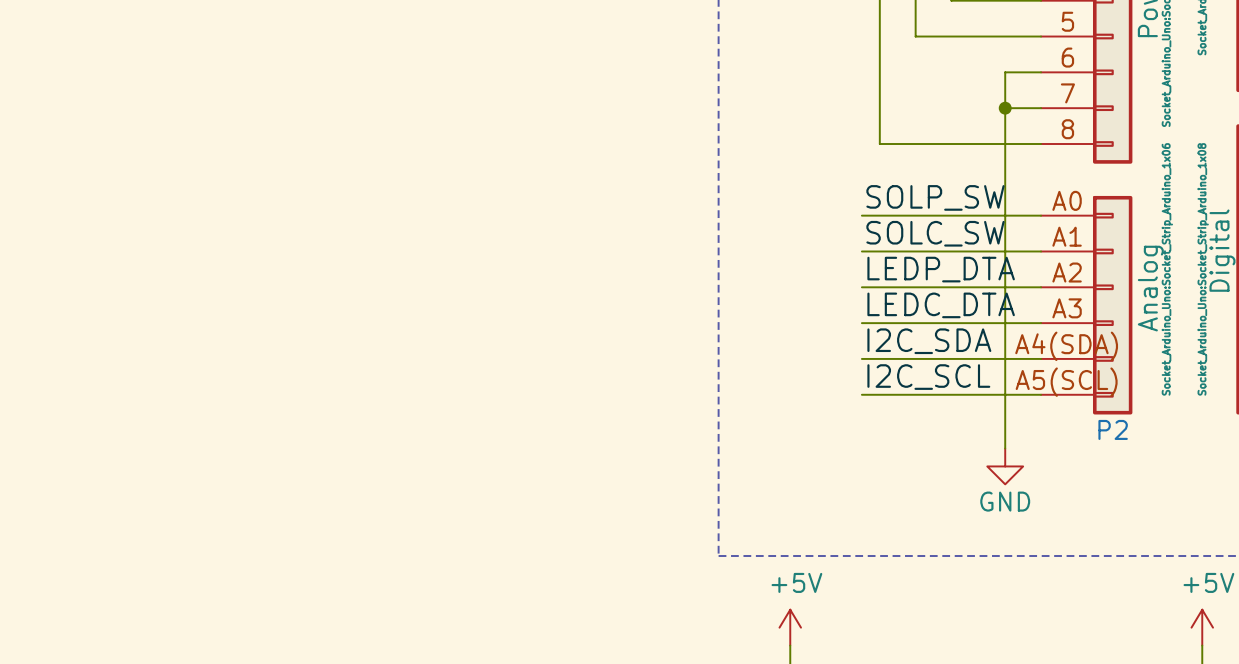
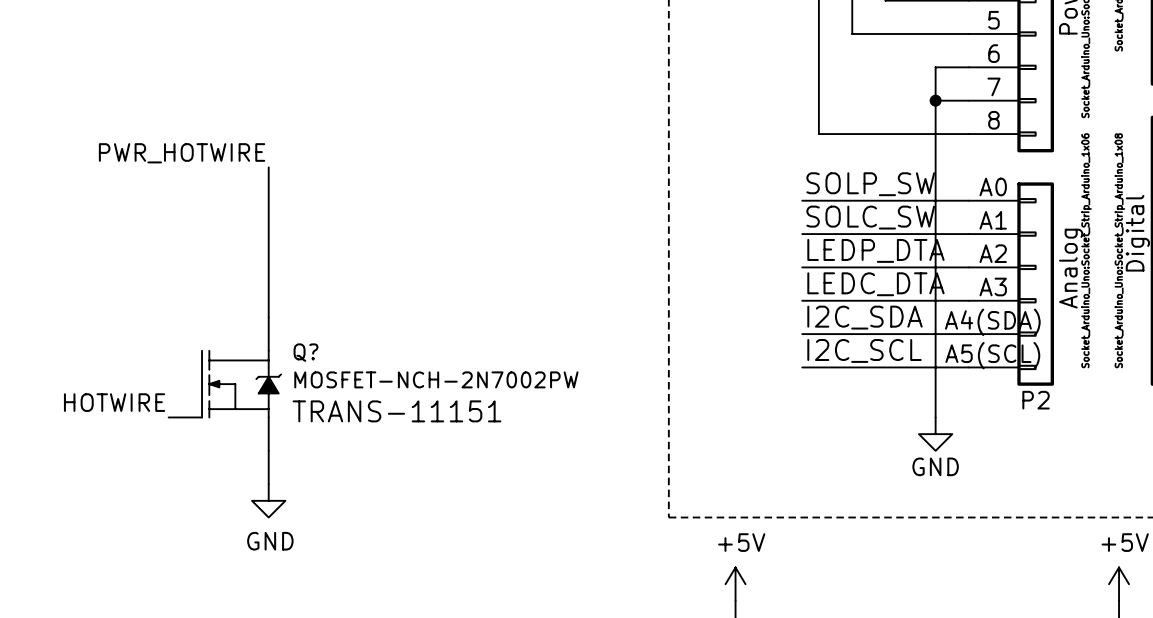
label: none -> PWR_HOTWIRE (182, 153)
wire: none -> (268, 167) (268, 317)
Q?: none -> MOSFET-NCH-2N7002PW (224, 384)
label: none -> HOTWIRE (114, 402)
wire: none -> (268, 450) (268, 484)
power symbol: none -> GND (268, 500)

